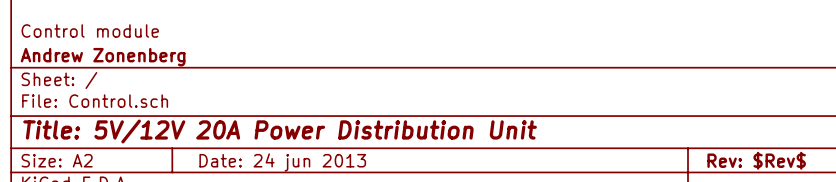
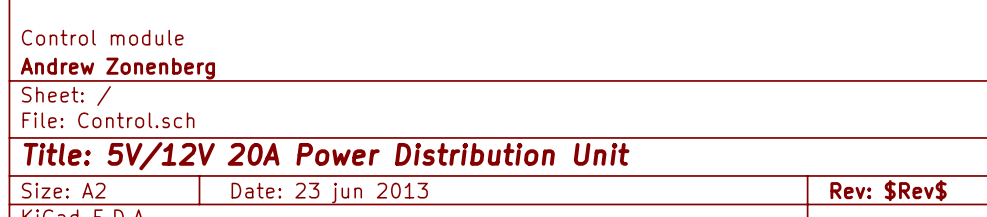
title block: Date: 24 jun 2013 (282, 162) -> Date: 23 jun 2013 (329, 193)

